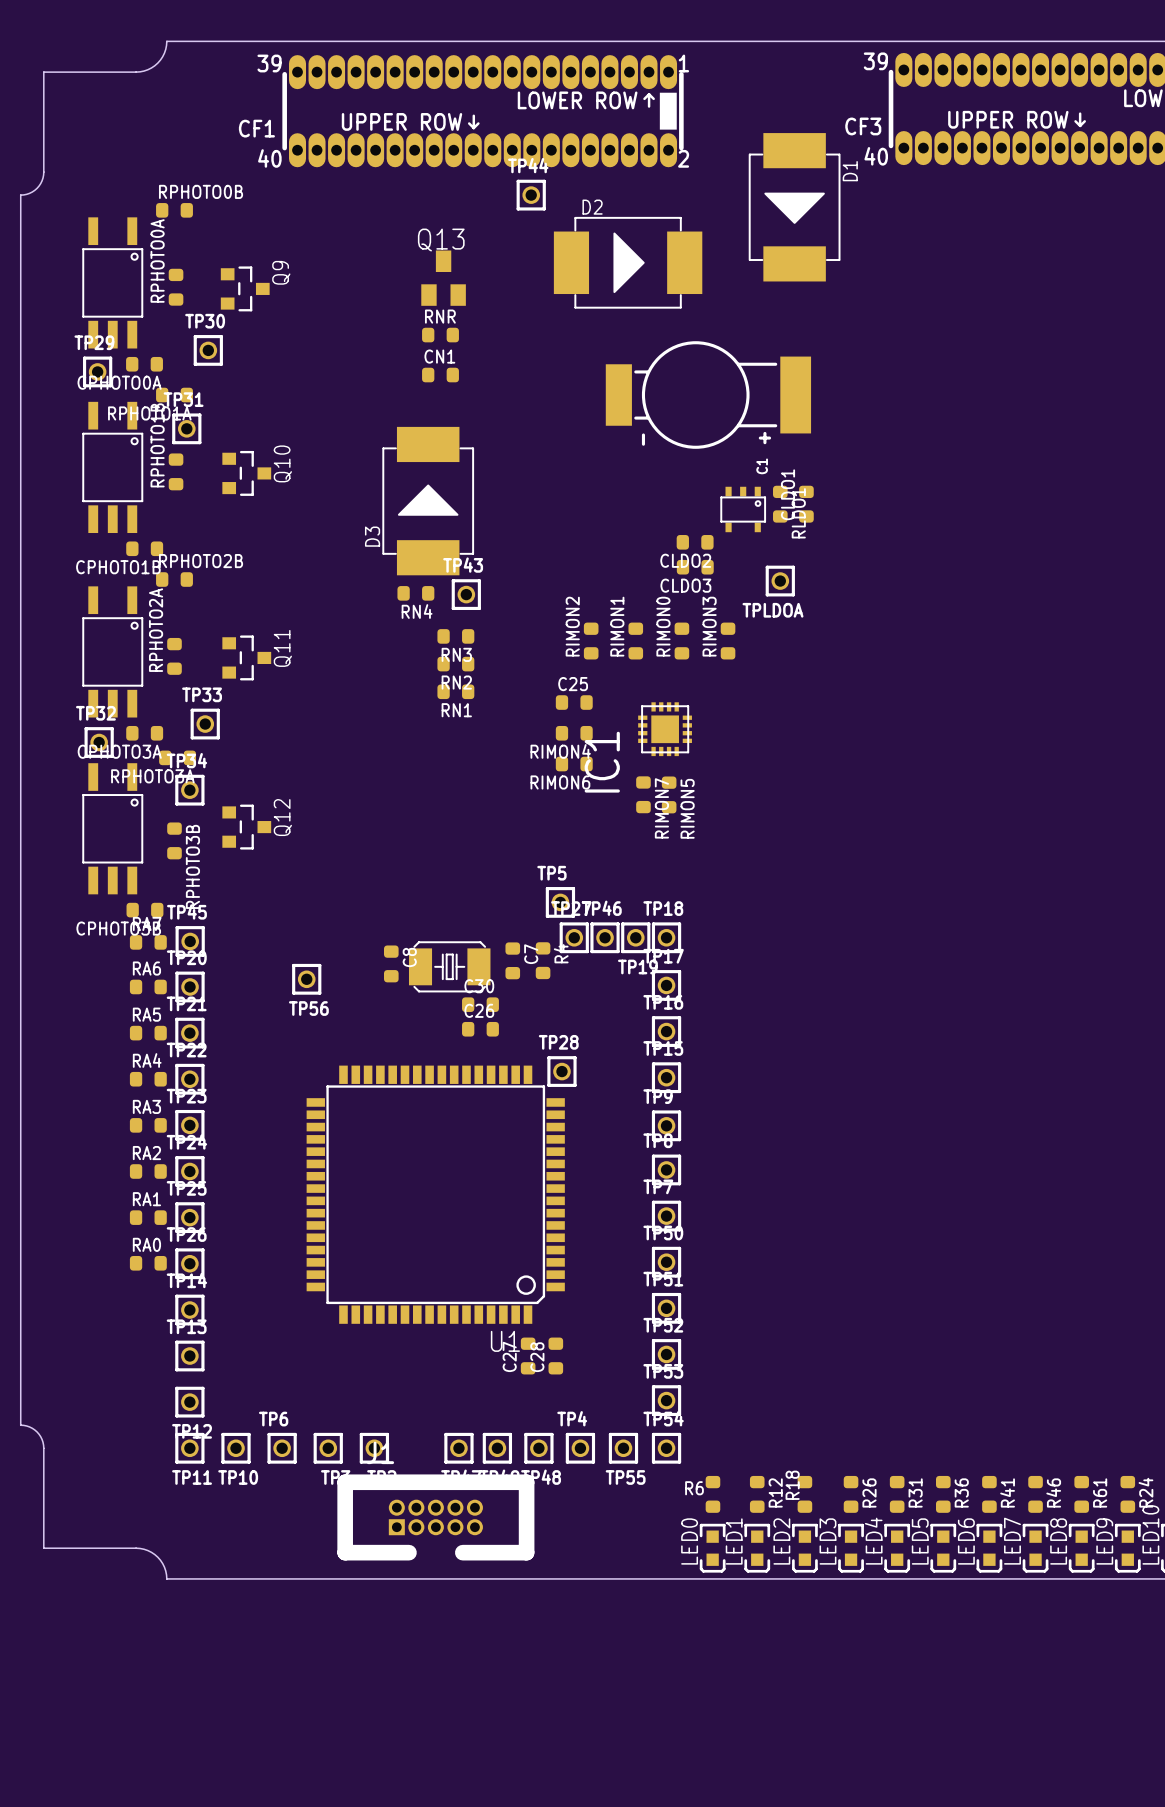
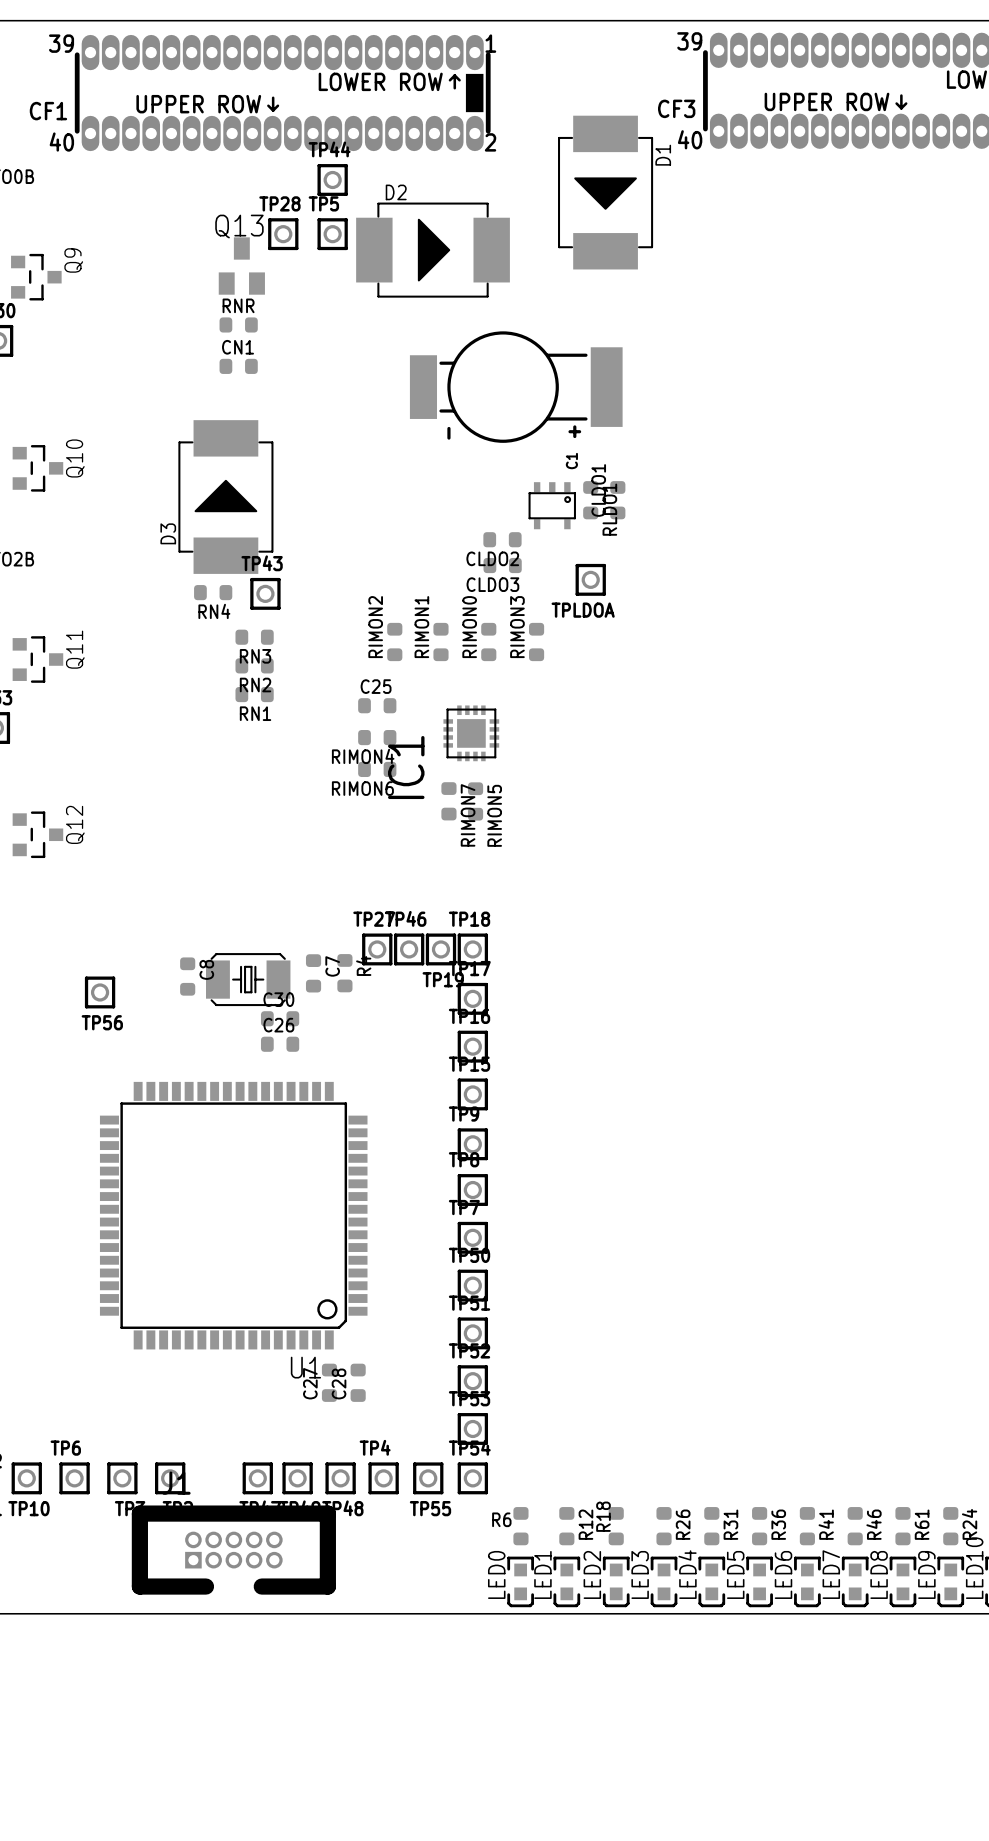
TP5 position: (560, 902) -> (332, 234)
TP28 position: (561, 1071) -> (283, 234)

